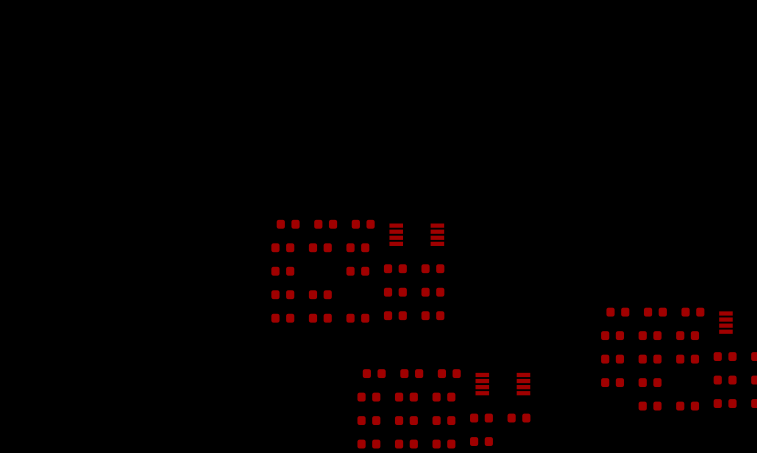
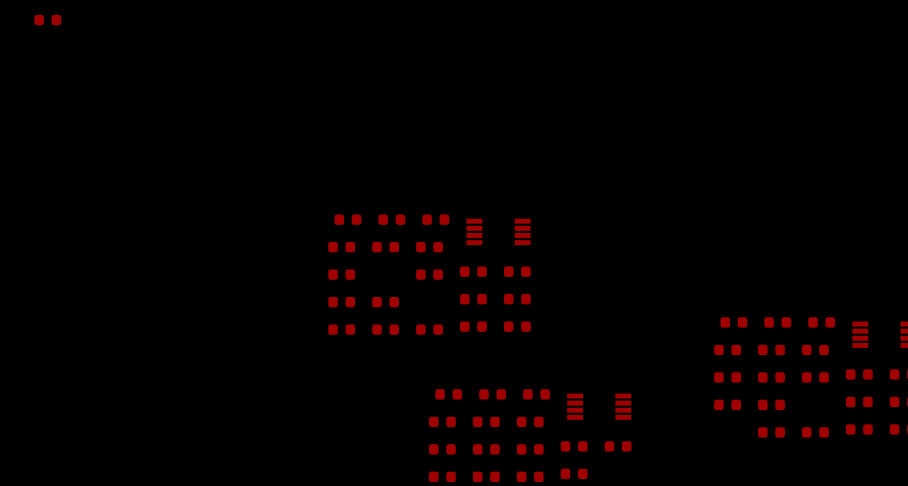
part: none -> (47, 20)

